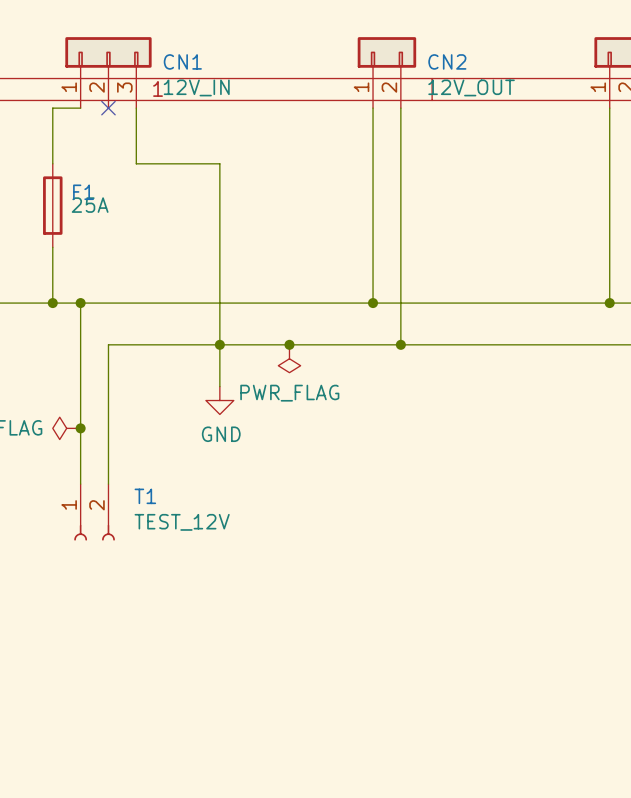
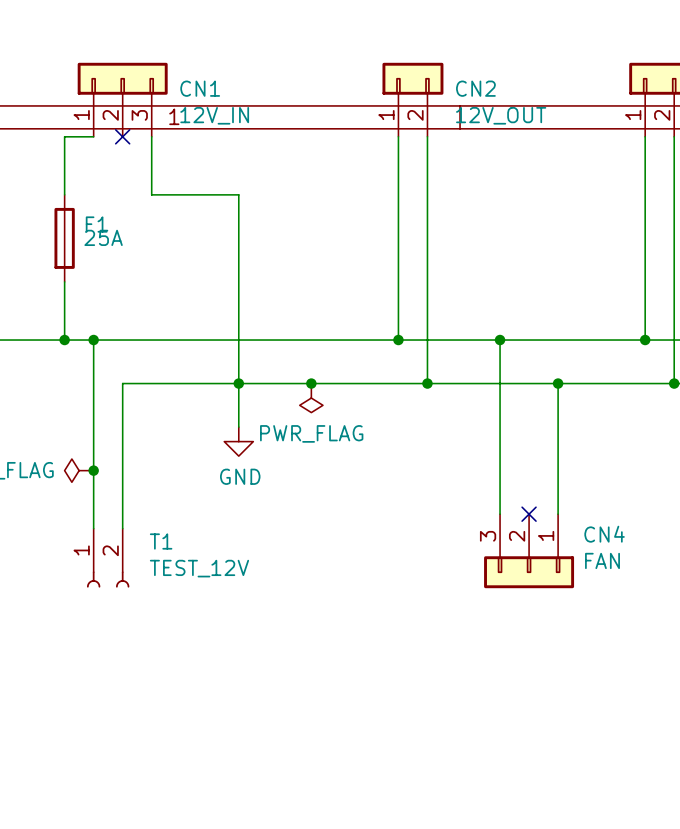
wire: none -> (500, 340) (500, 514)
junction: none -> (500, 340)
wire: none -> (558, 383) (558, 514)
junction: none -> (558, 383)
no-connect mark: none -> (529, 514)
CN4: none -> FAN (529, 551)

